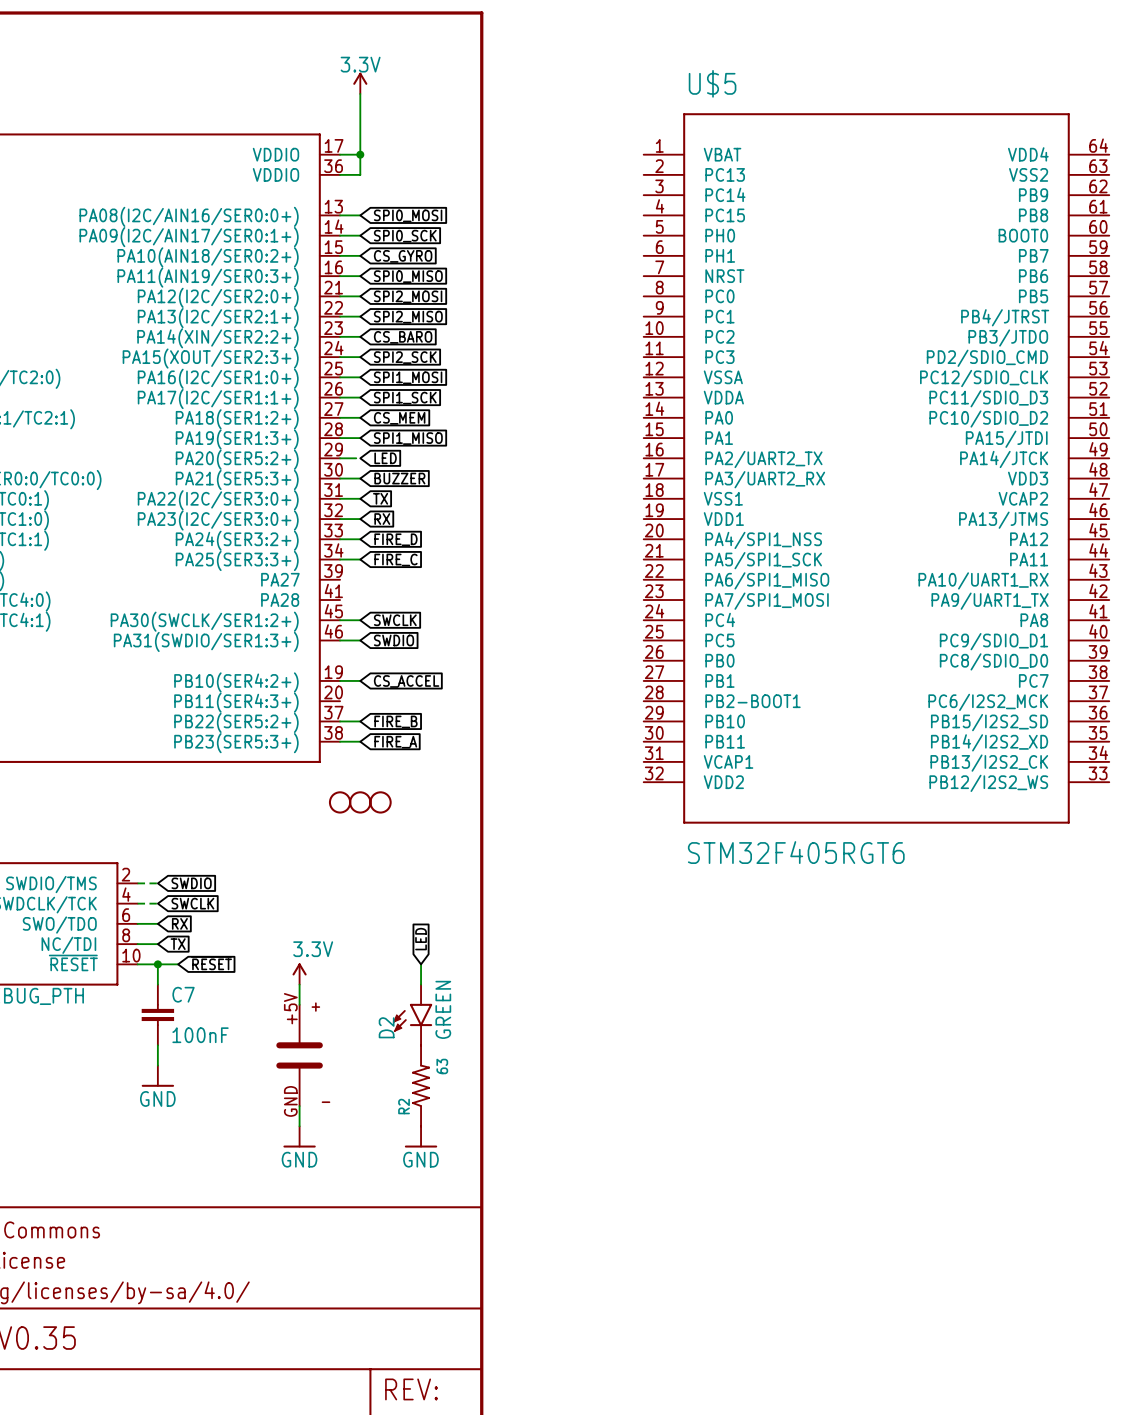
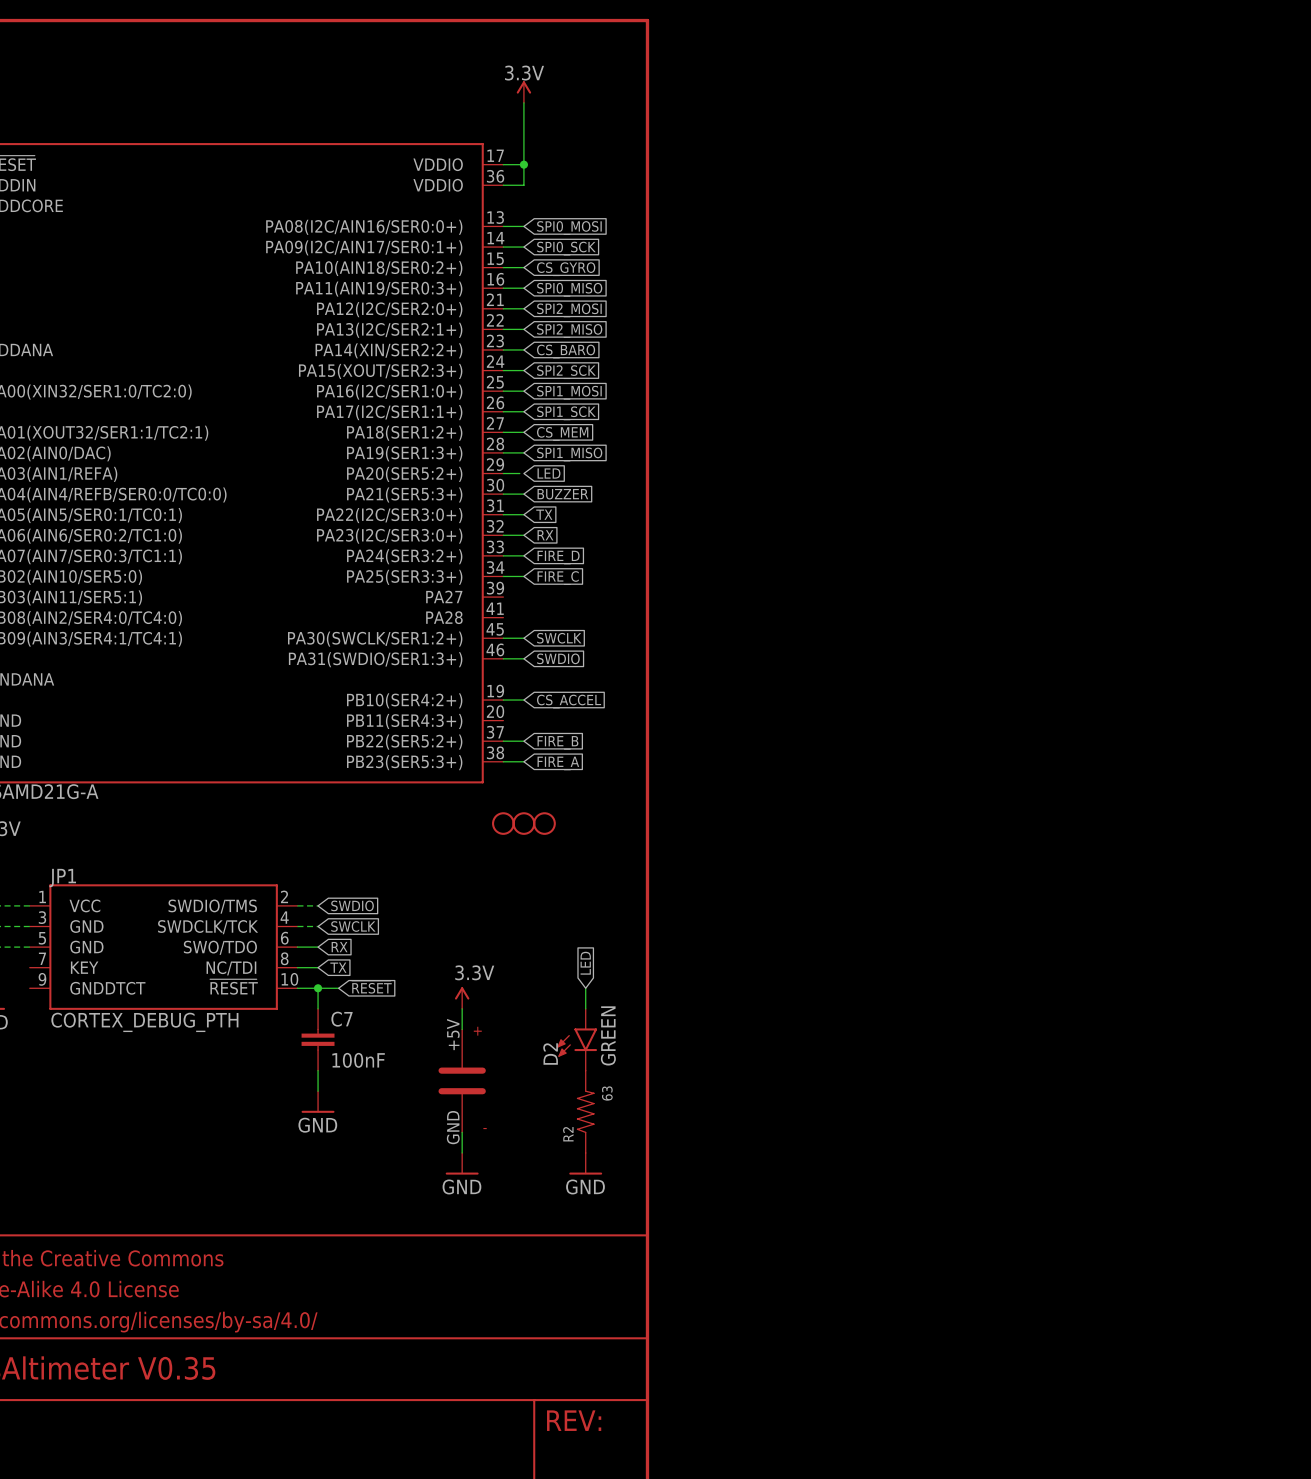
U$5: STM32F405RGT6 (876, 468) -> none

